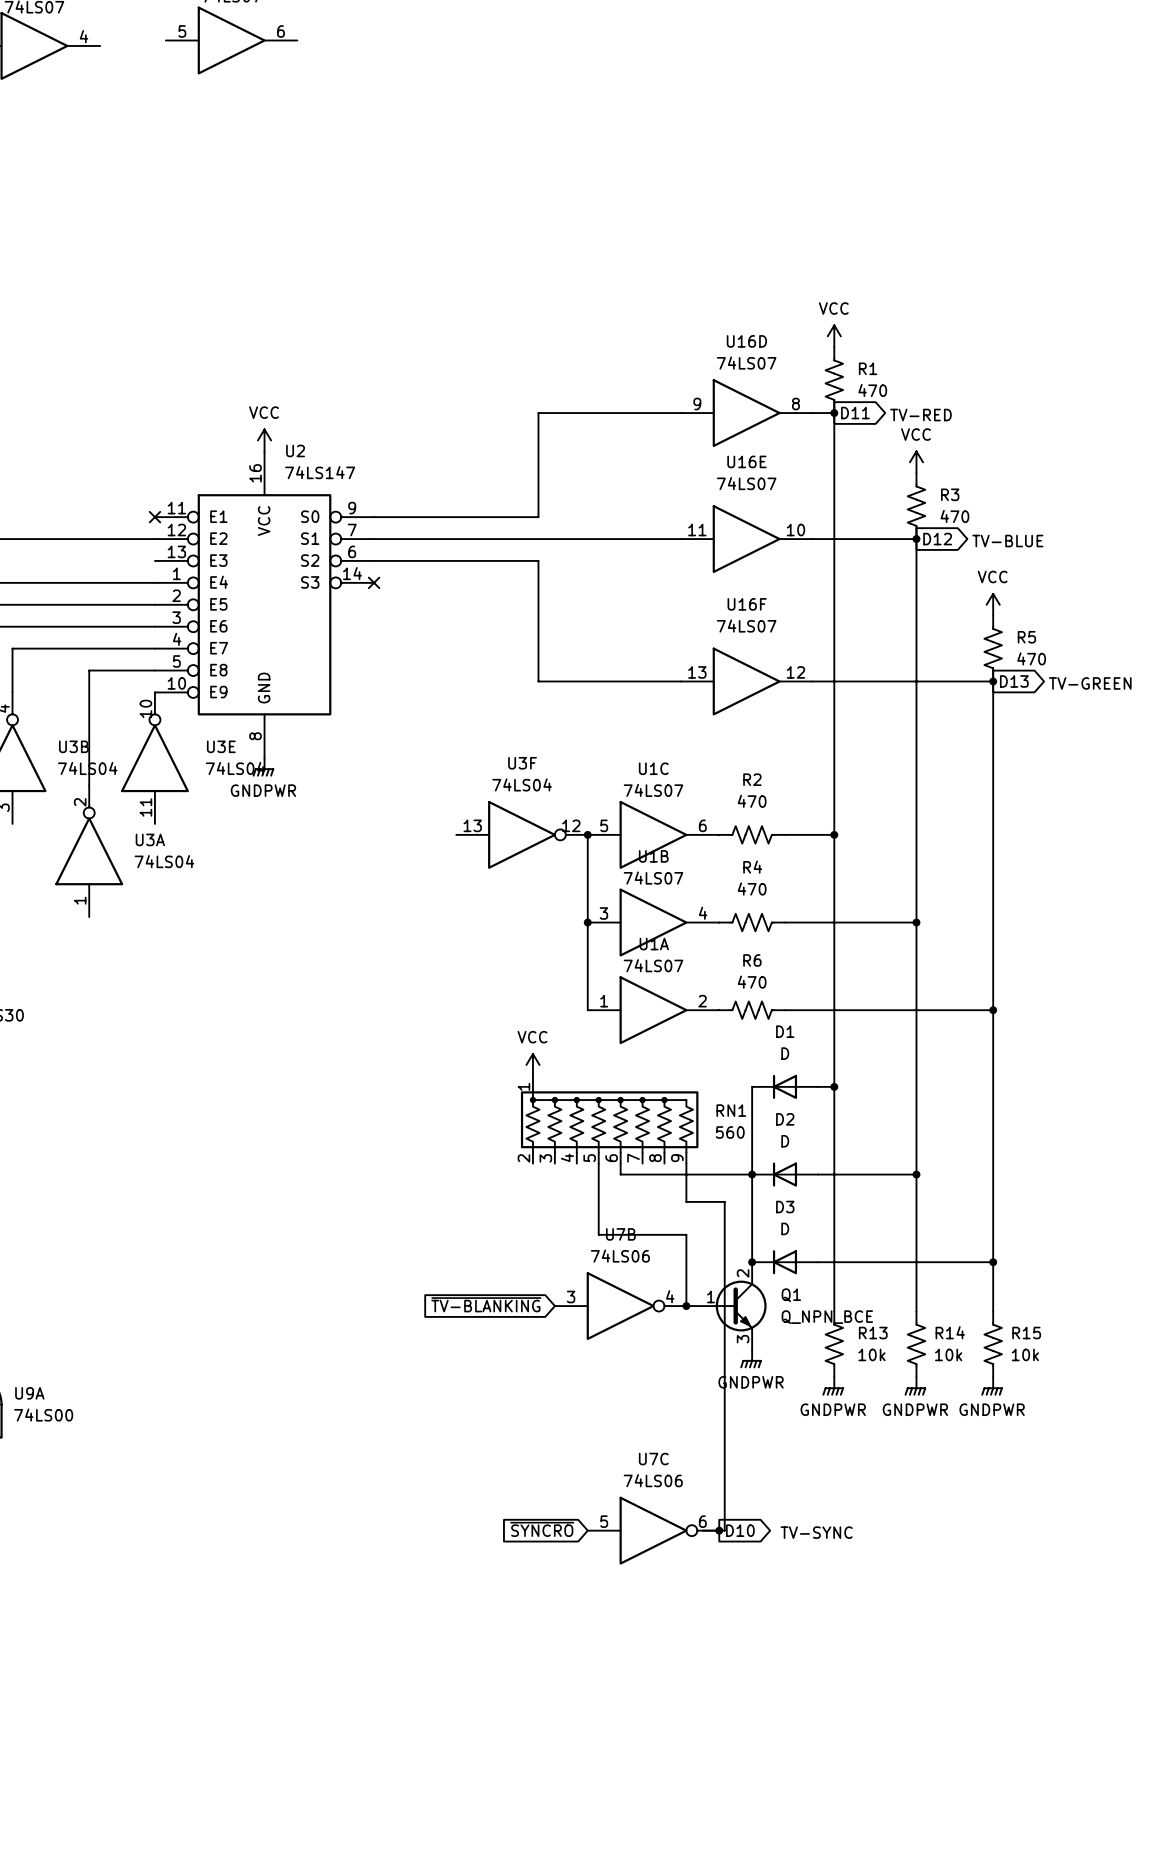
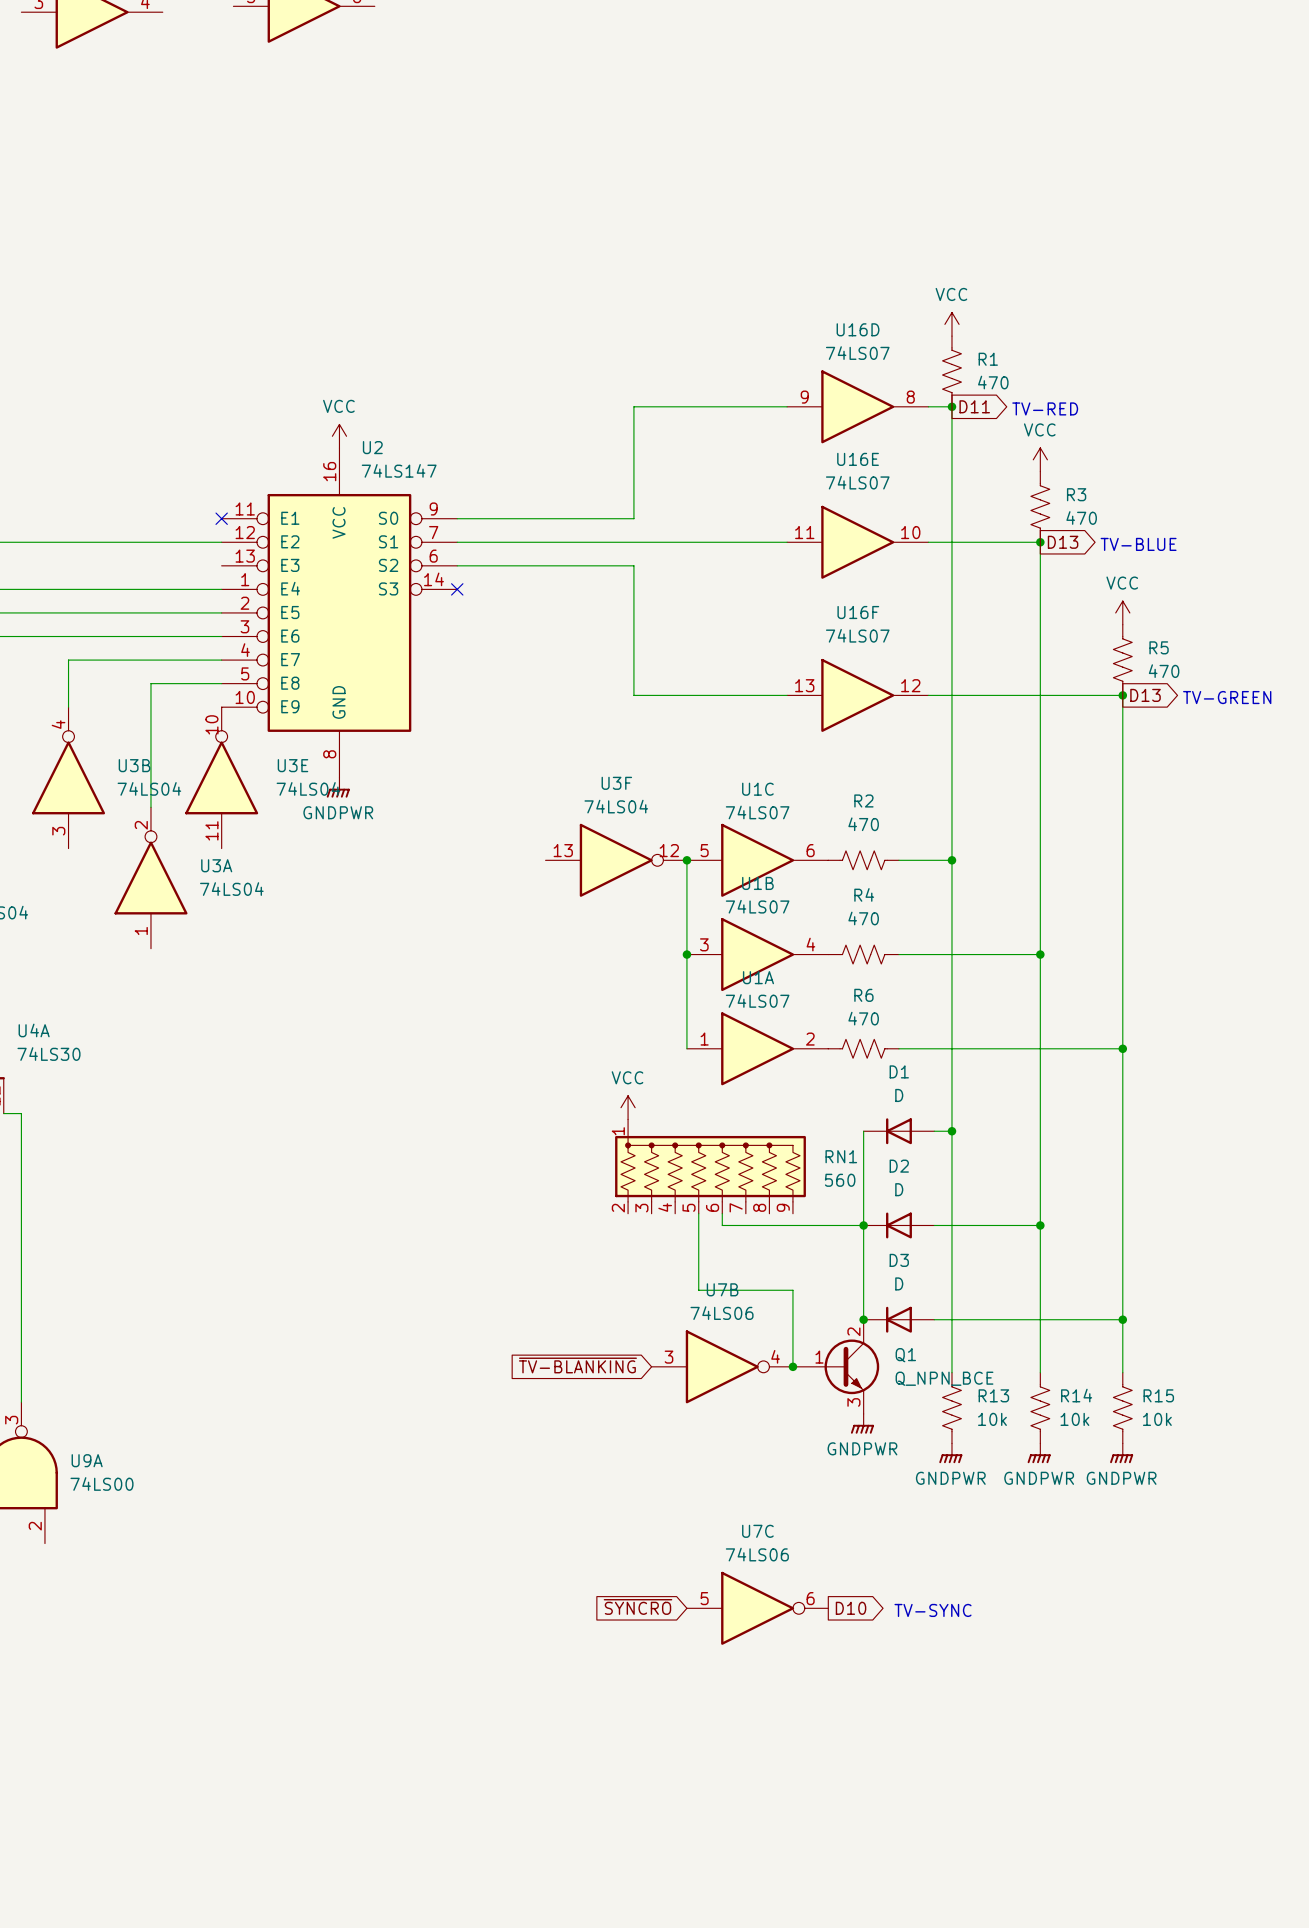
global label: D12 (937, 539) -> D13 (1063, 542)
wire: (686, 1163) (686, 1201) (724, 1201) (724, 1530) (702, 1530) -> none
junction: (719, 1530) -> none

